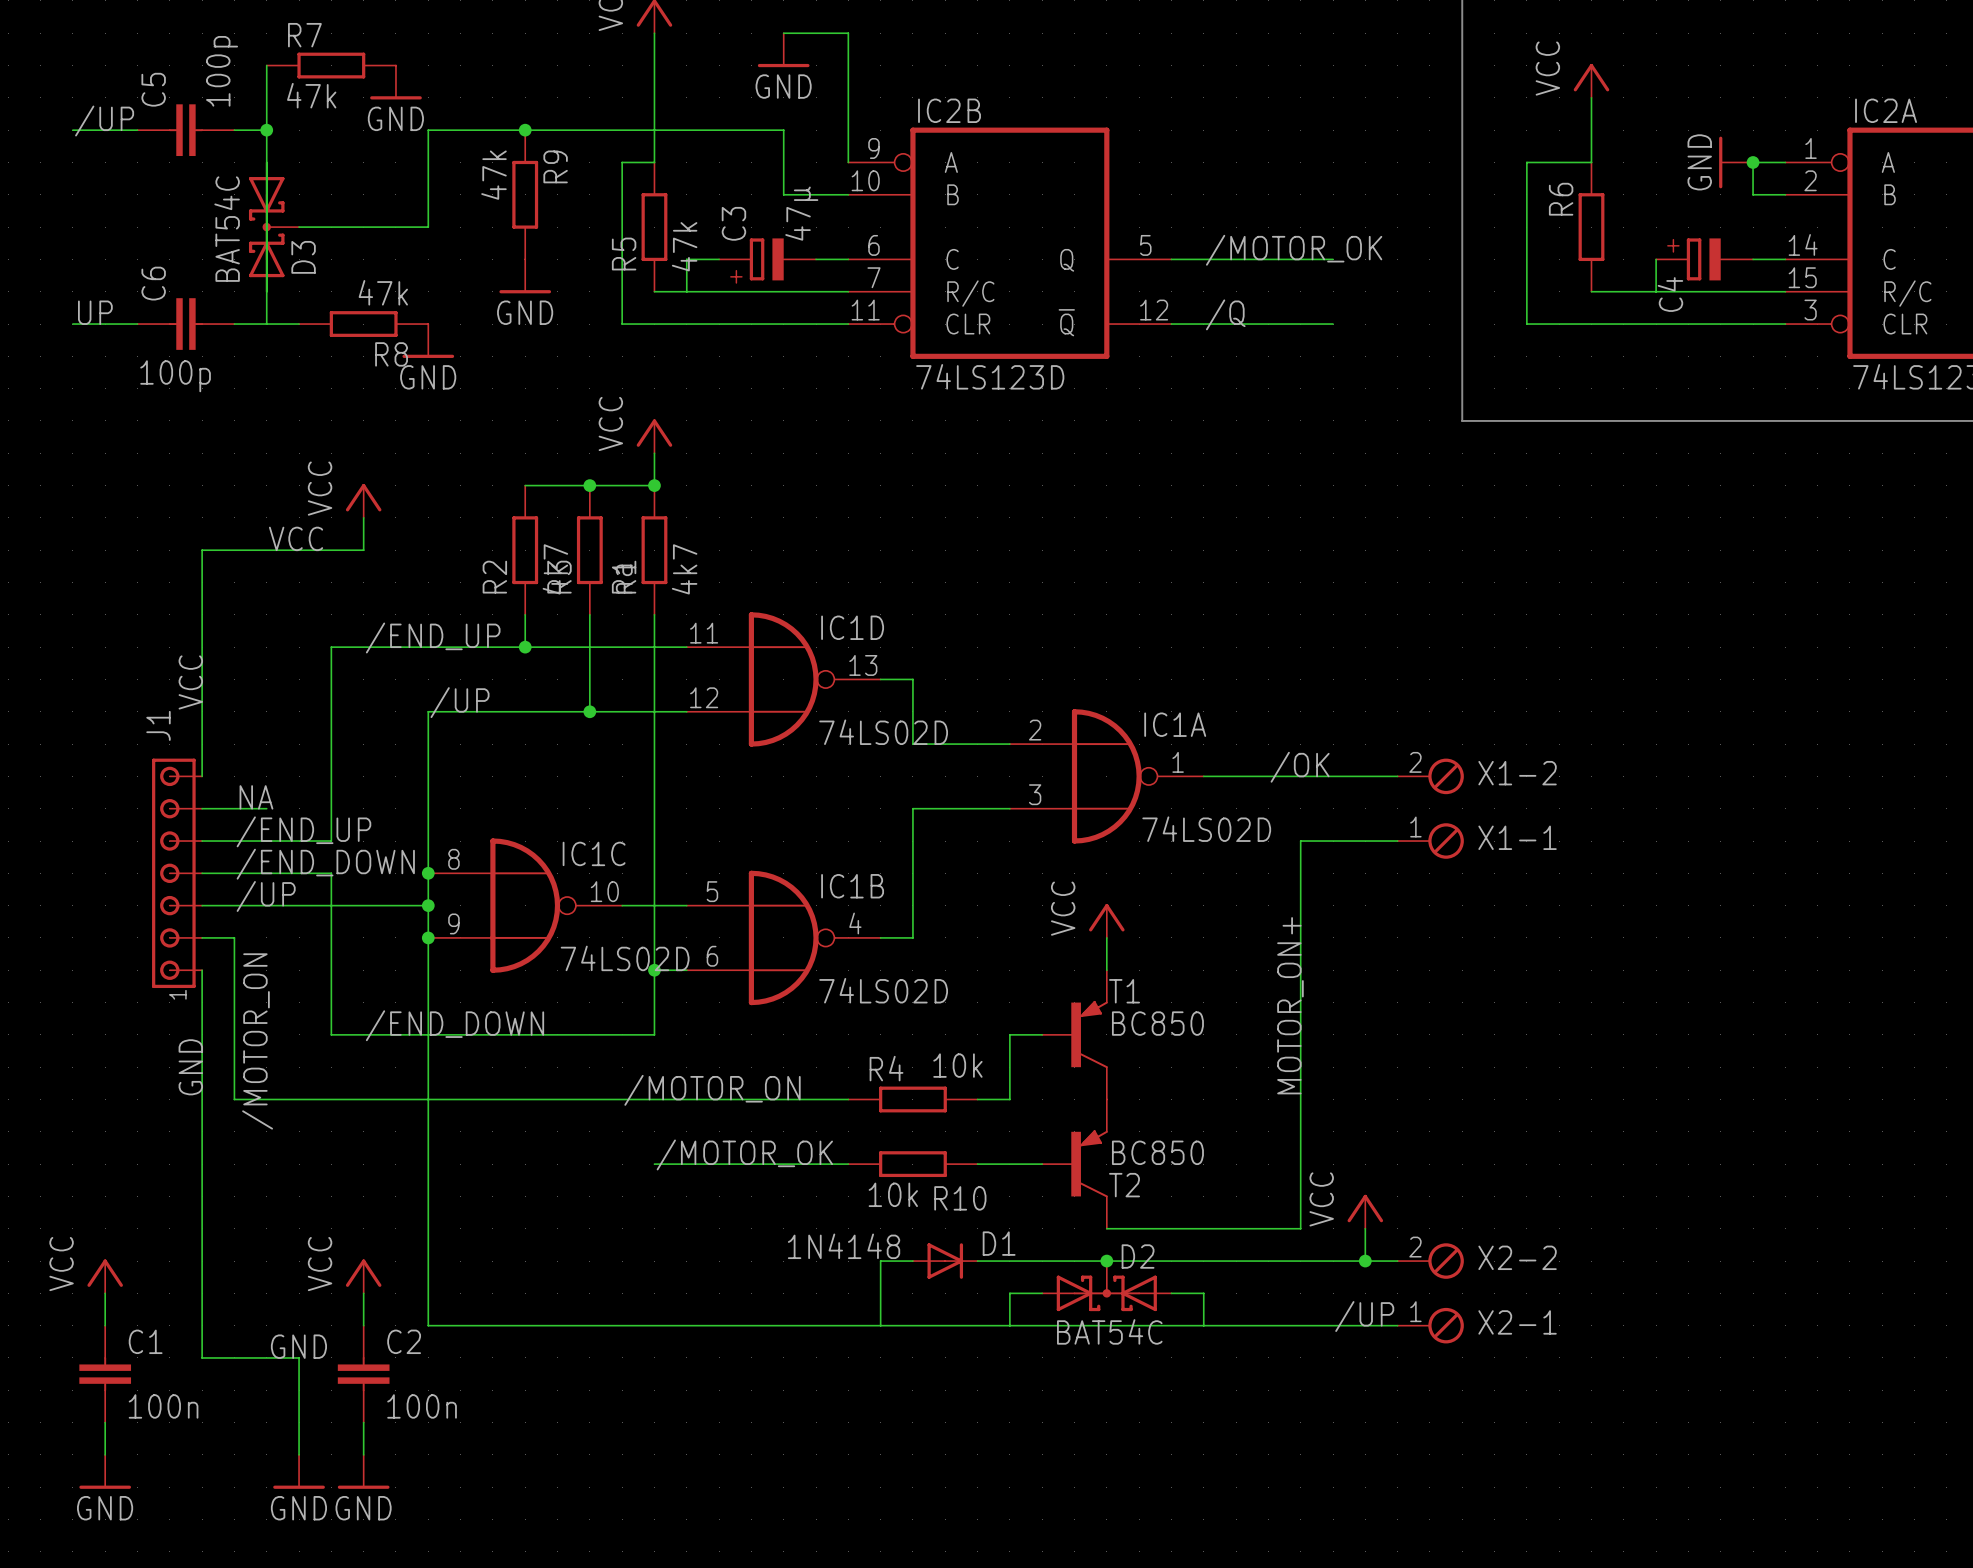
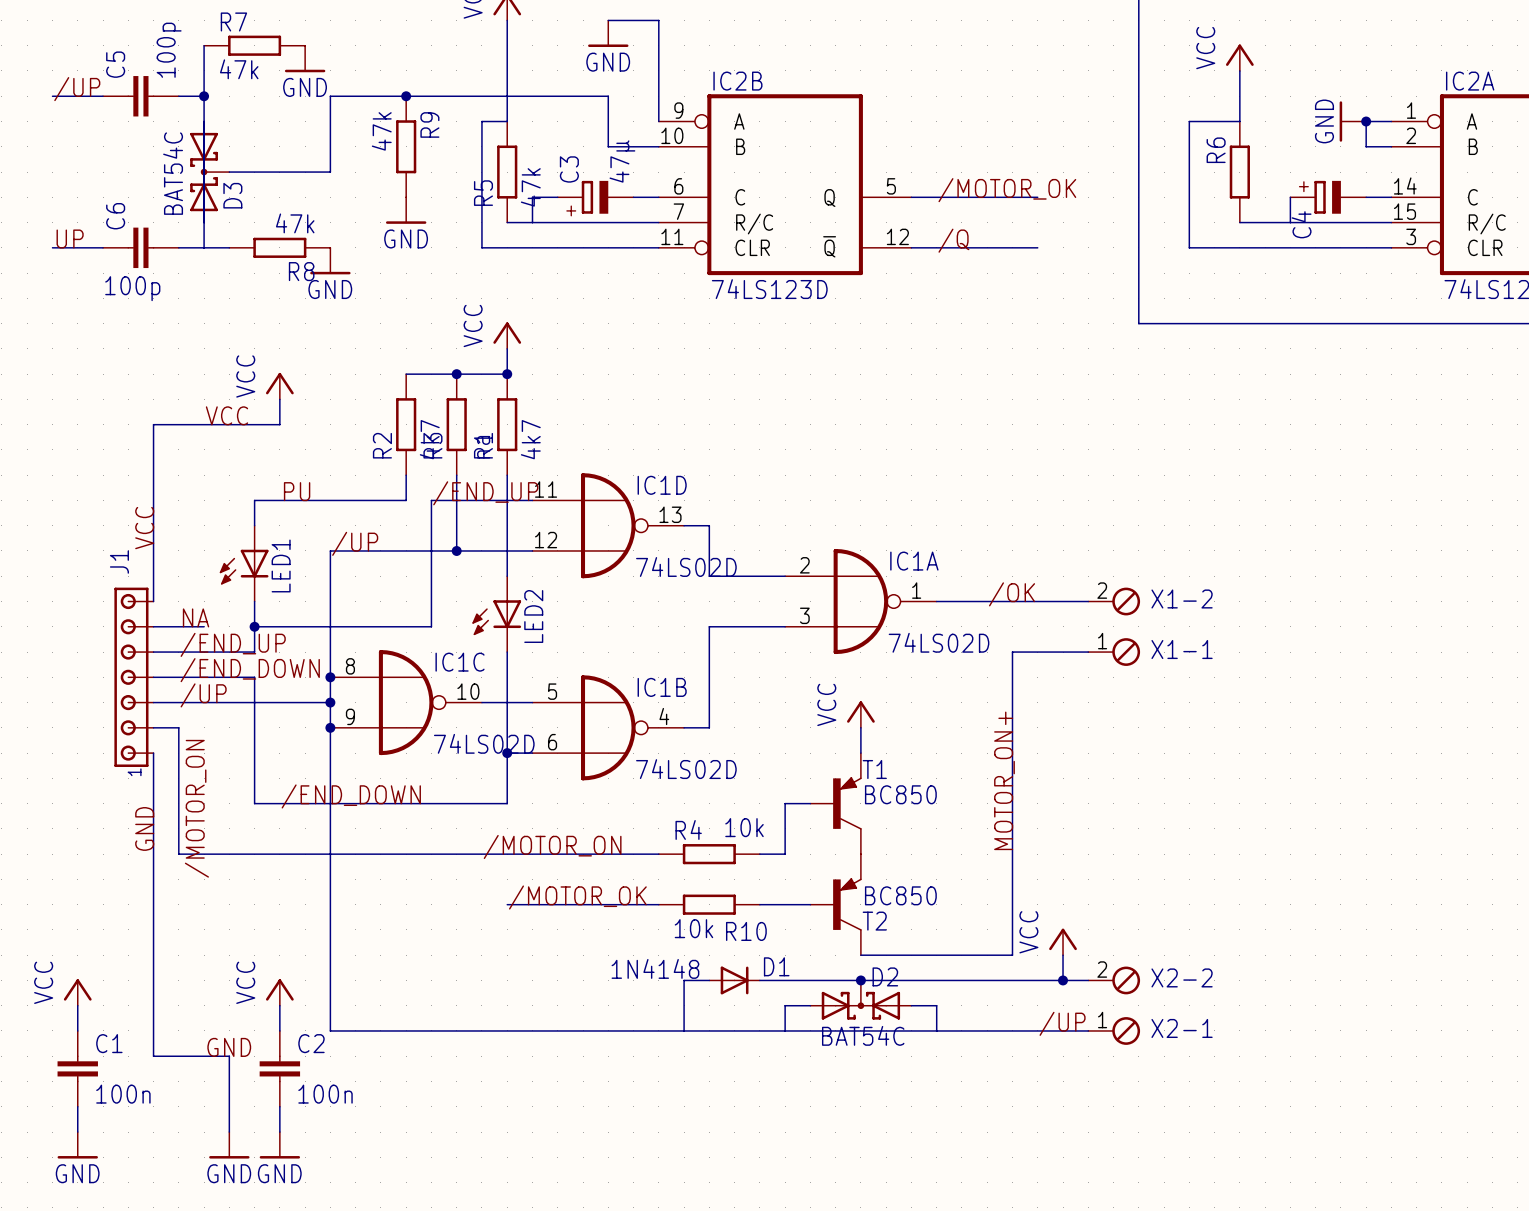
label: /END_UP (433, 637) -> PU (297, 491)
label: none -> /END_UP (485, 493)
wire: (525, 647) (557, 647) -> (254, 626) (431, 626) (431, 500)
junction: (525, 647) -> none
LED1: none -> (244, 563)
LED2: none -> (496, 614)
junction: none -> (254, 626)

